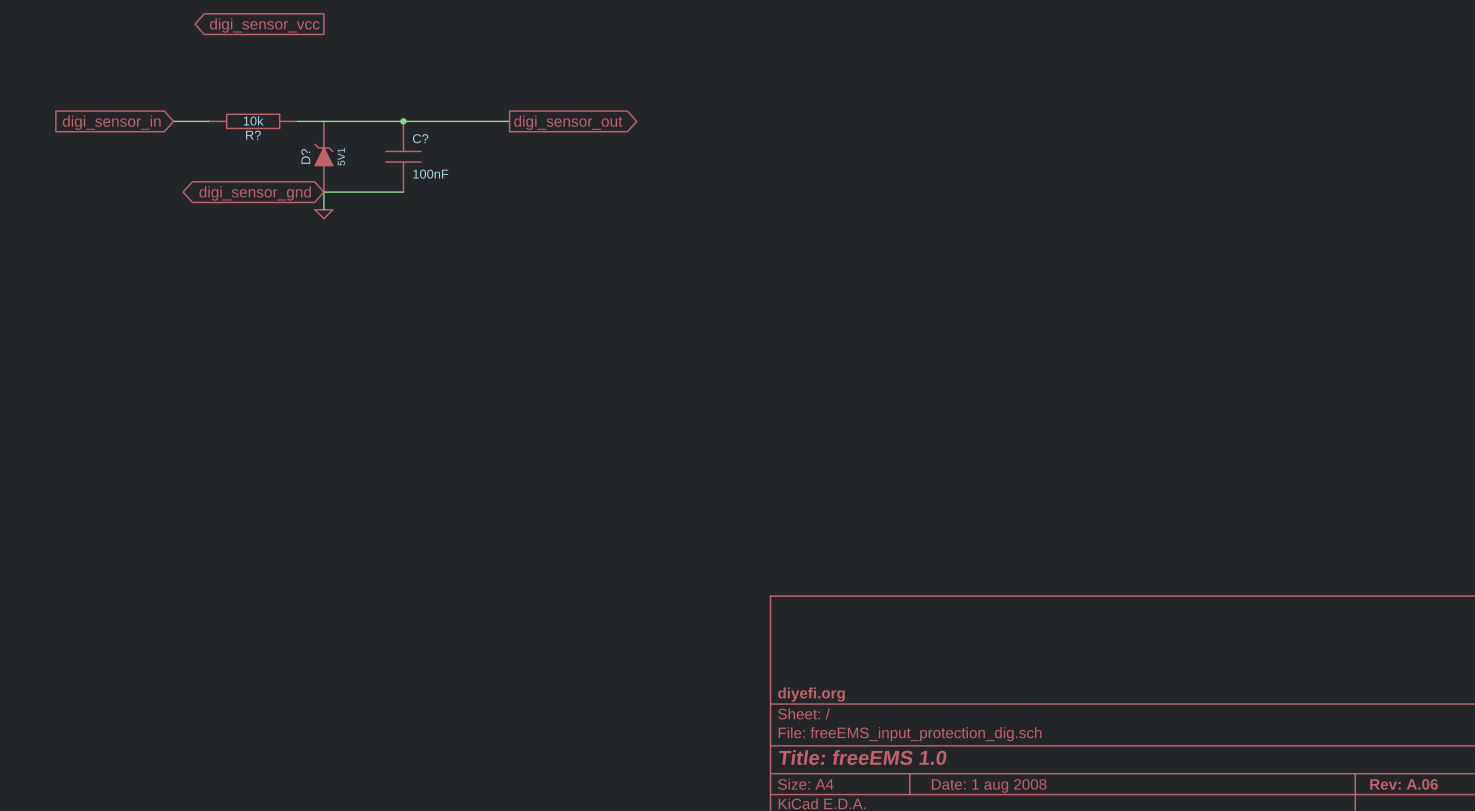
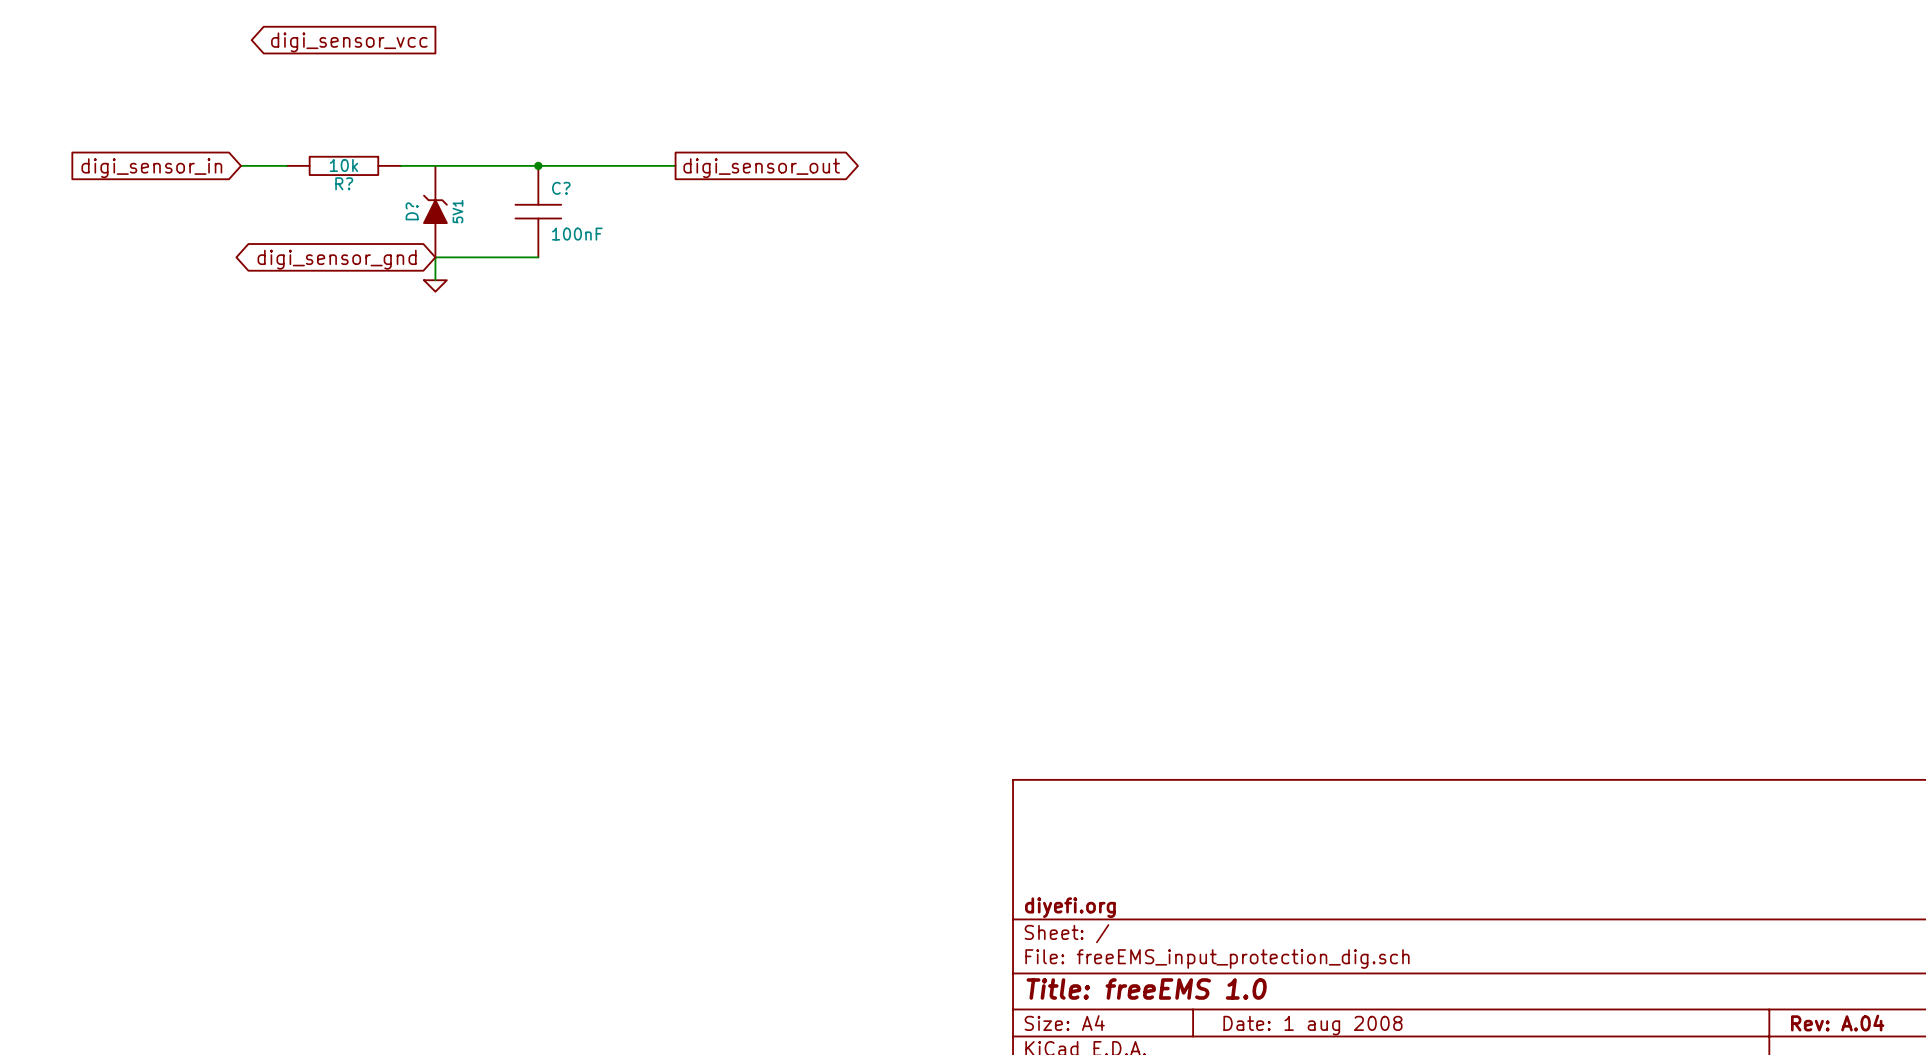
title block: Rev: A.06 (1404, 784) -> Rev: A.04 (1837, 1023)

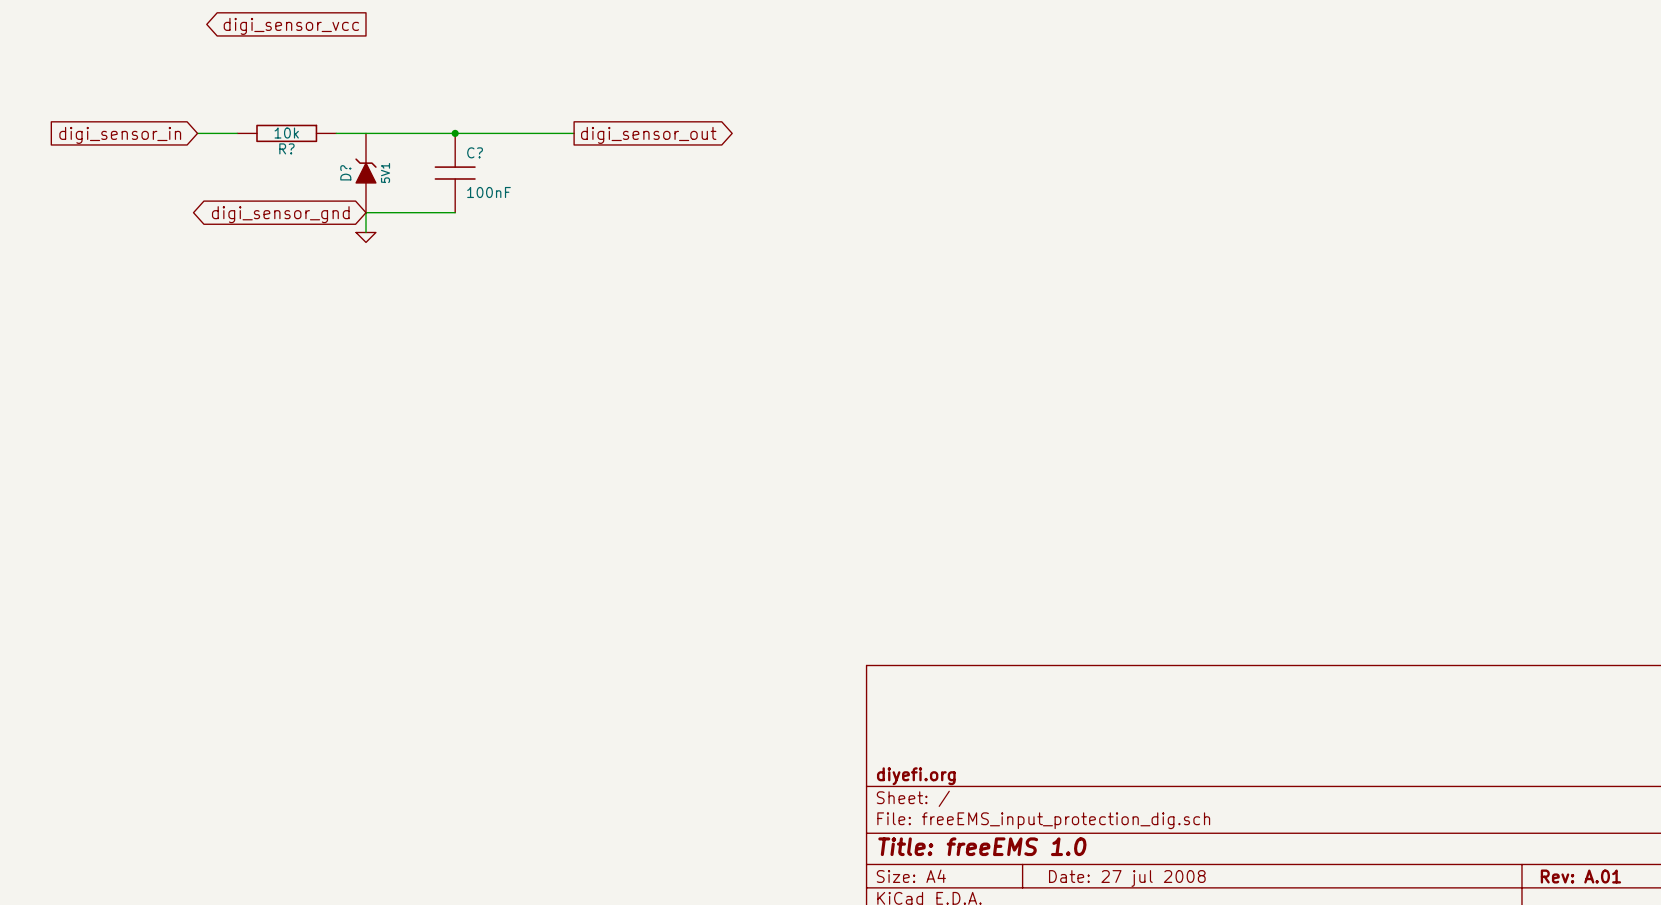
title block: Rev: A.04 (1837, 1023) -> Rev: A.01 (1580, 876)
title block: Date: 1 aug 2008 (1312, 1025) -> Date: 27 jul 2008 (1127, 878)

